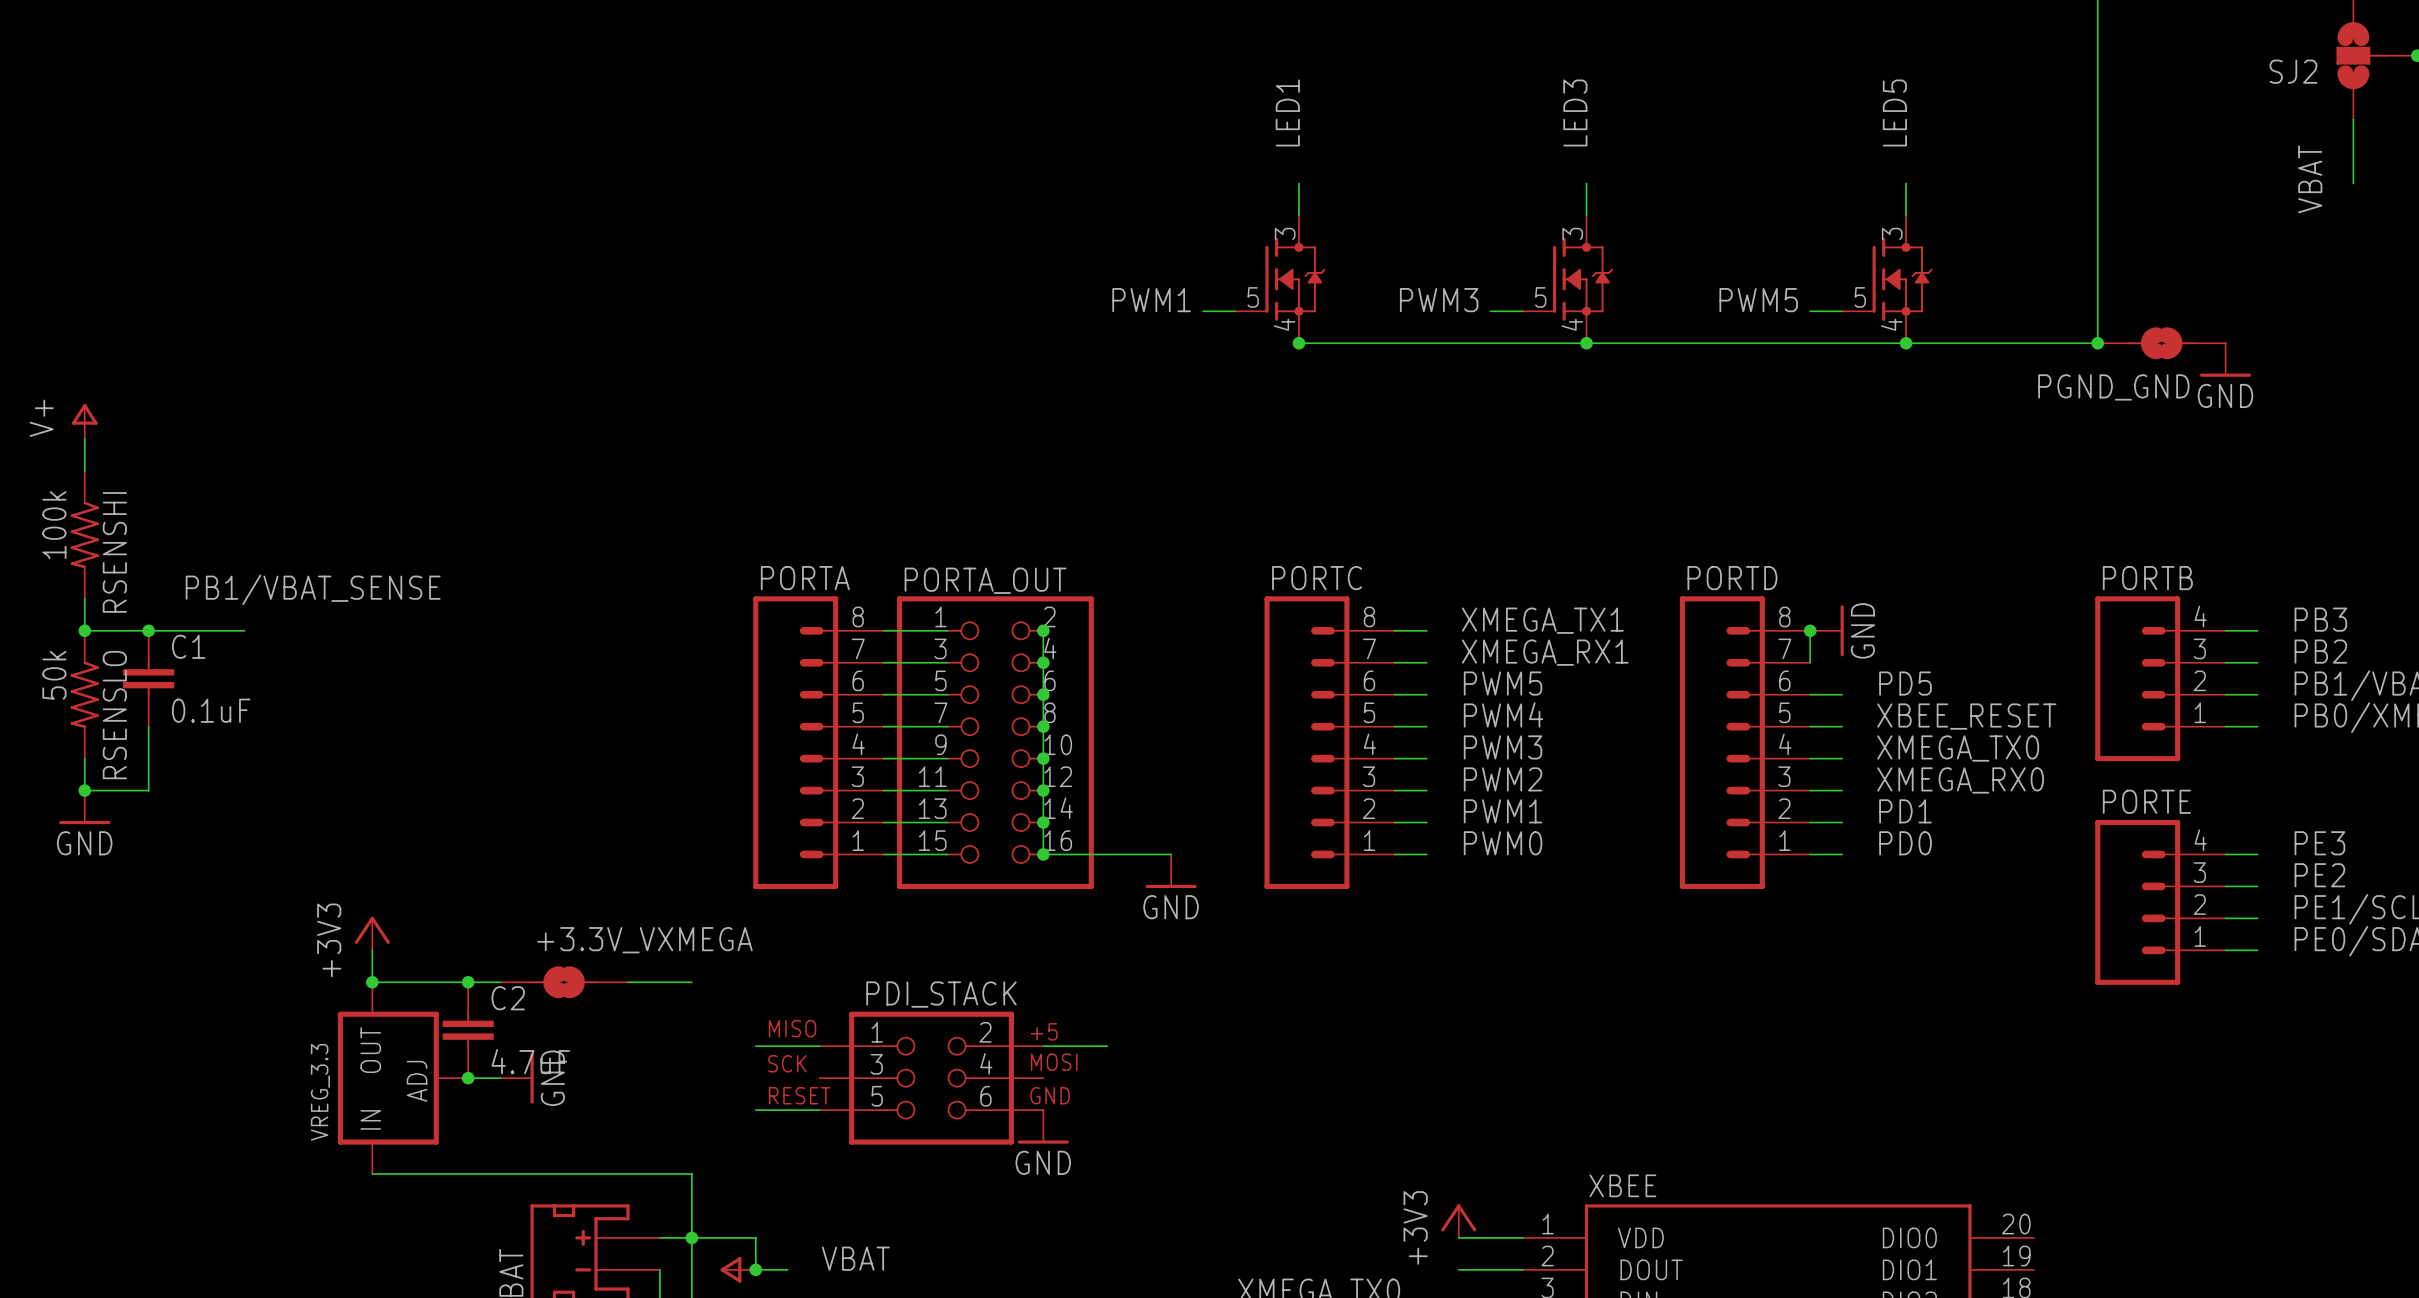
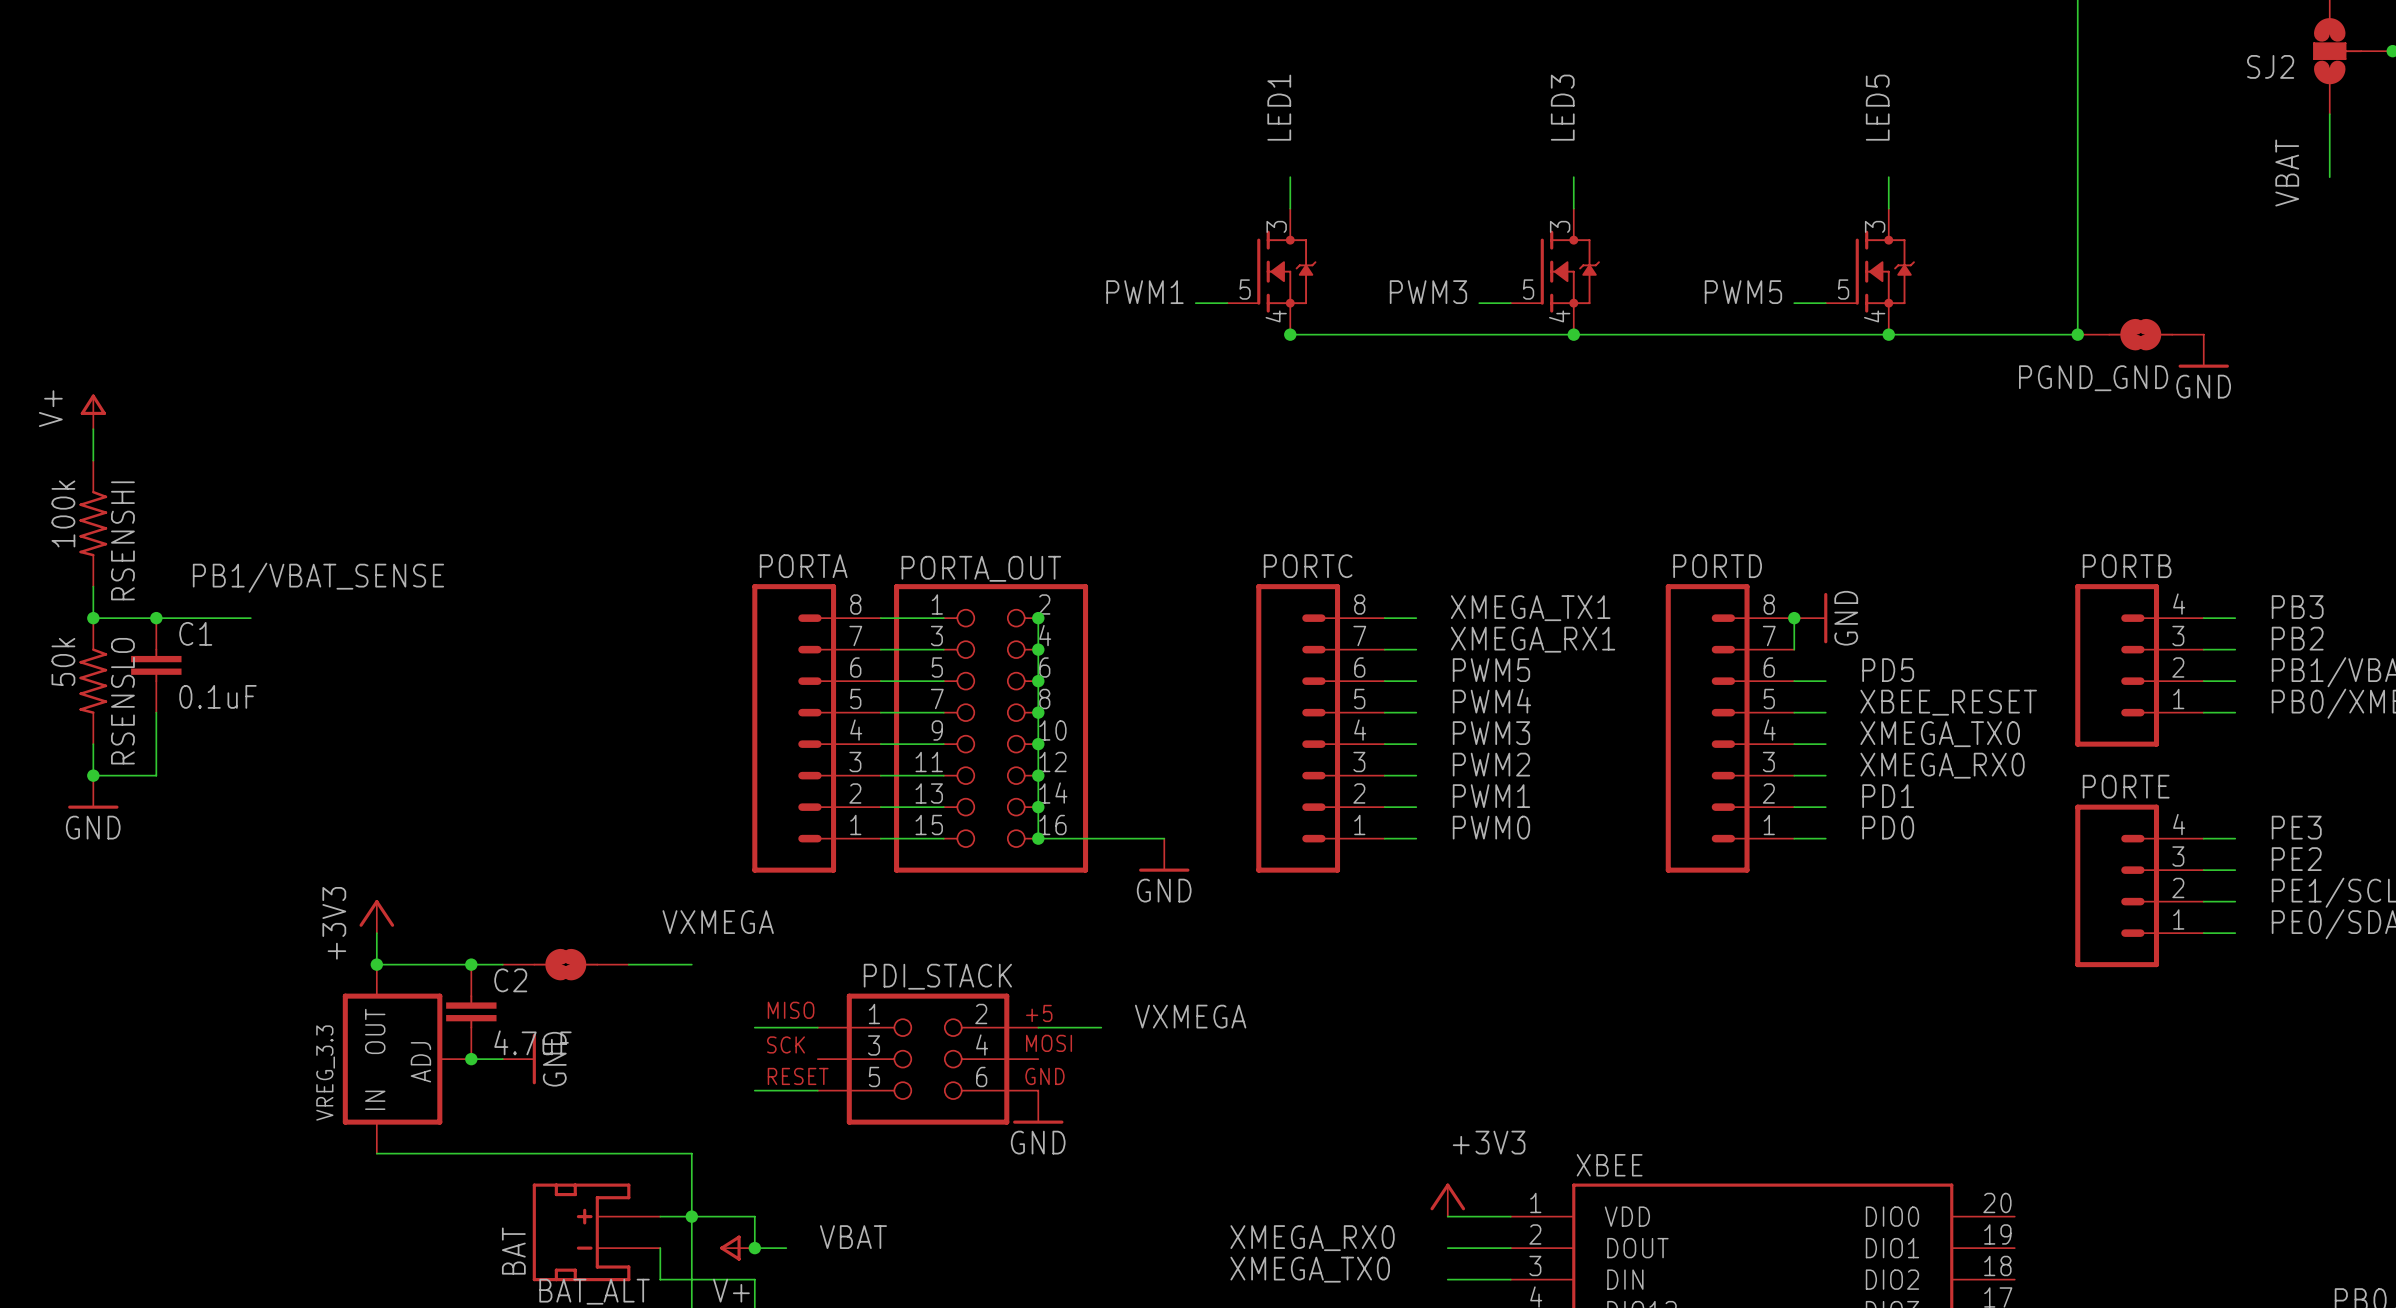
label: none -> VXMEGA (718, 922)
+3.3V_VXMEGA name: +3.3V_VXMEGA (644, 940) -> none
label: none -> VXMEGA (1190, 1016)
power symbol text rotation: 0° (1415, 1227) -> 90° clockwise (1489, 1142)
power symbol text position: +3V3 (1415, 1227) -> +3V3 (1489, 1142)
label: none -> XMEGA_RX0 (1312, 1238)

